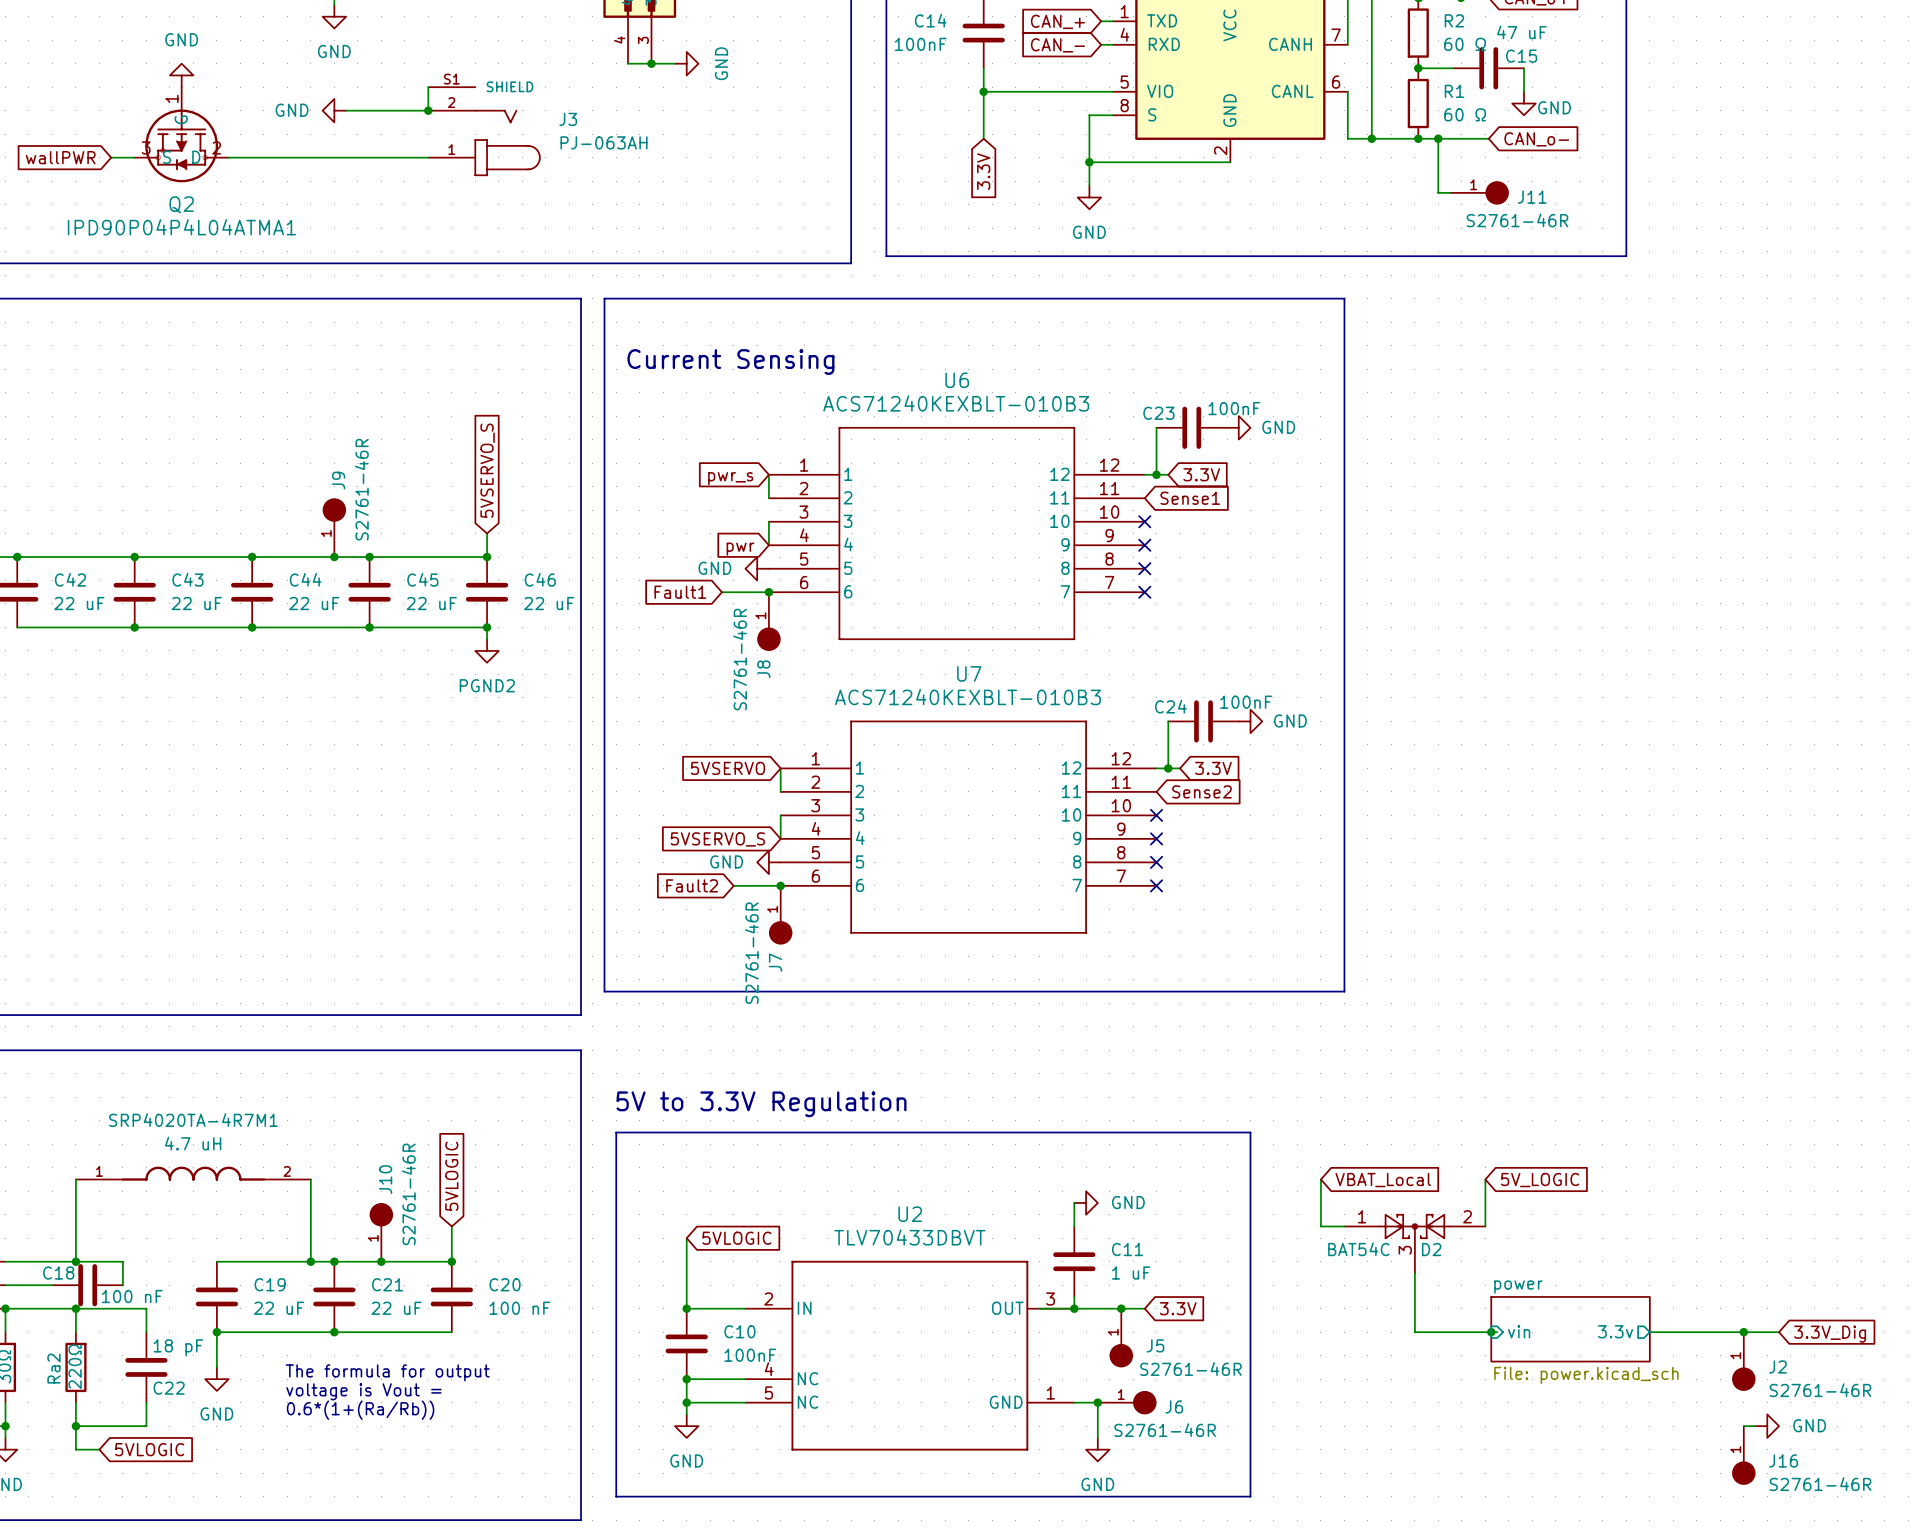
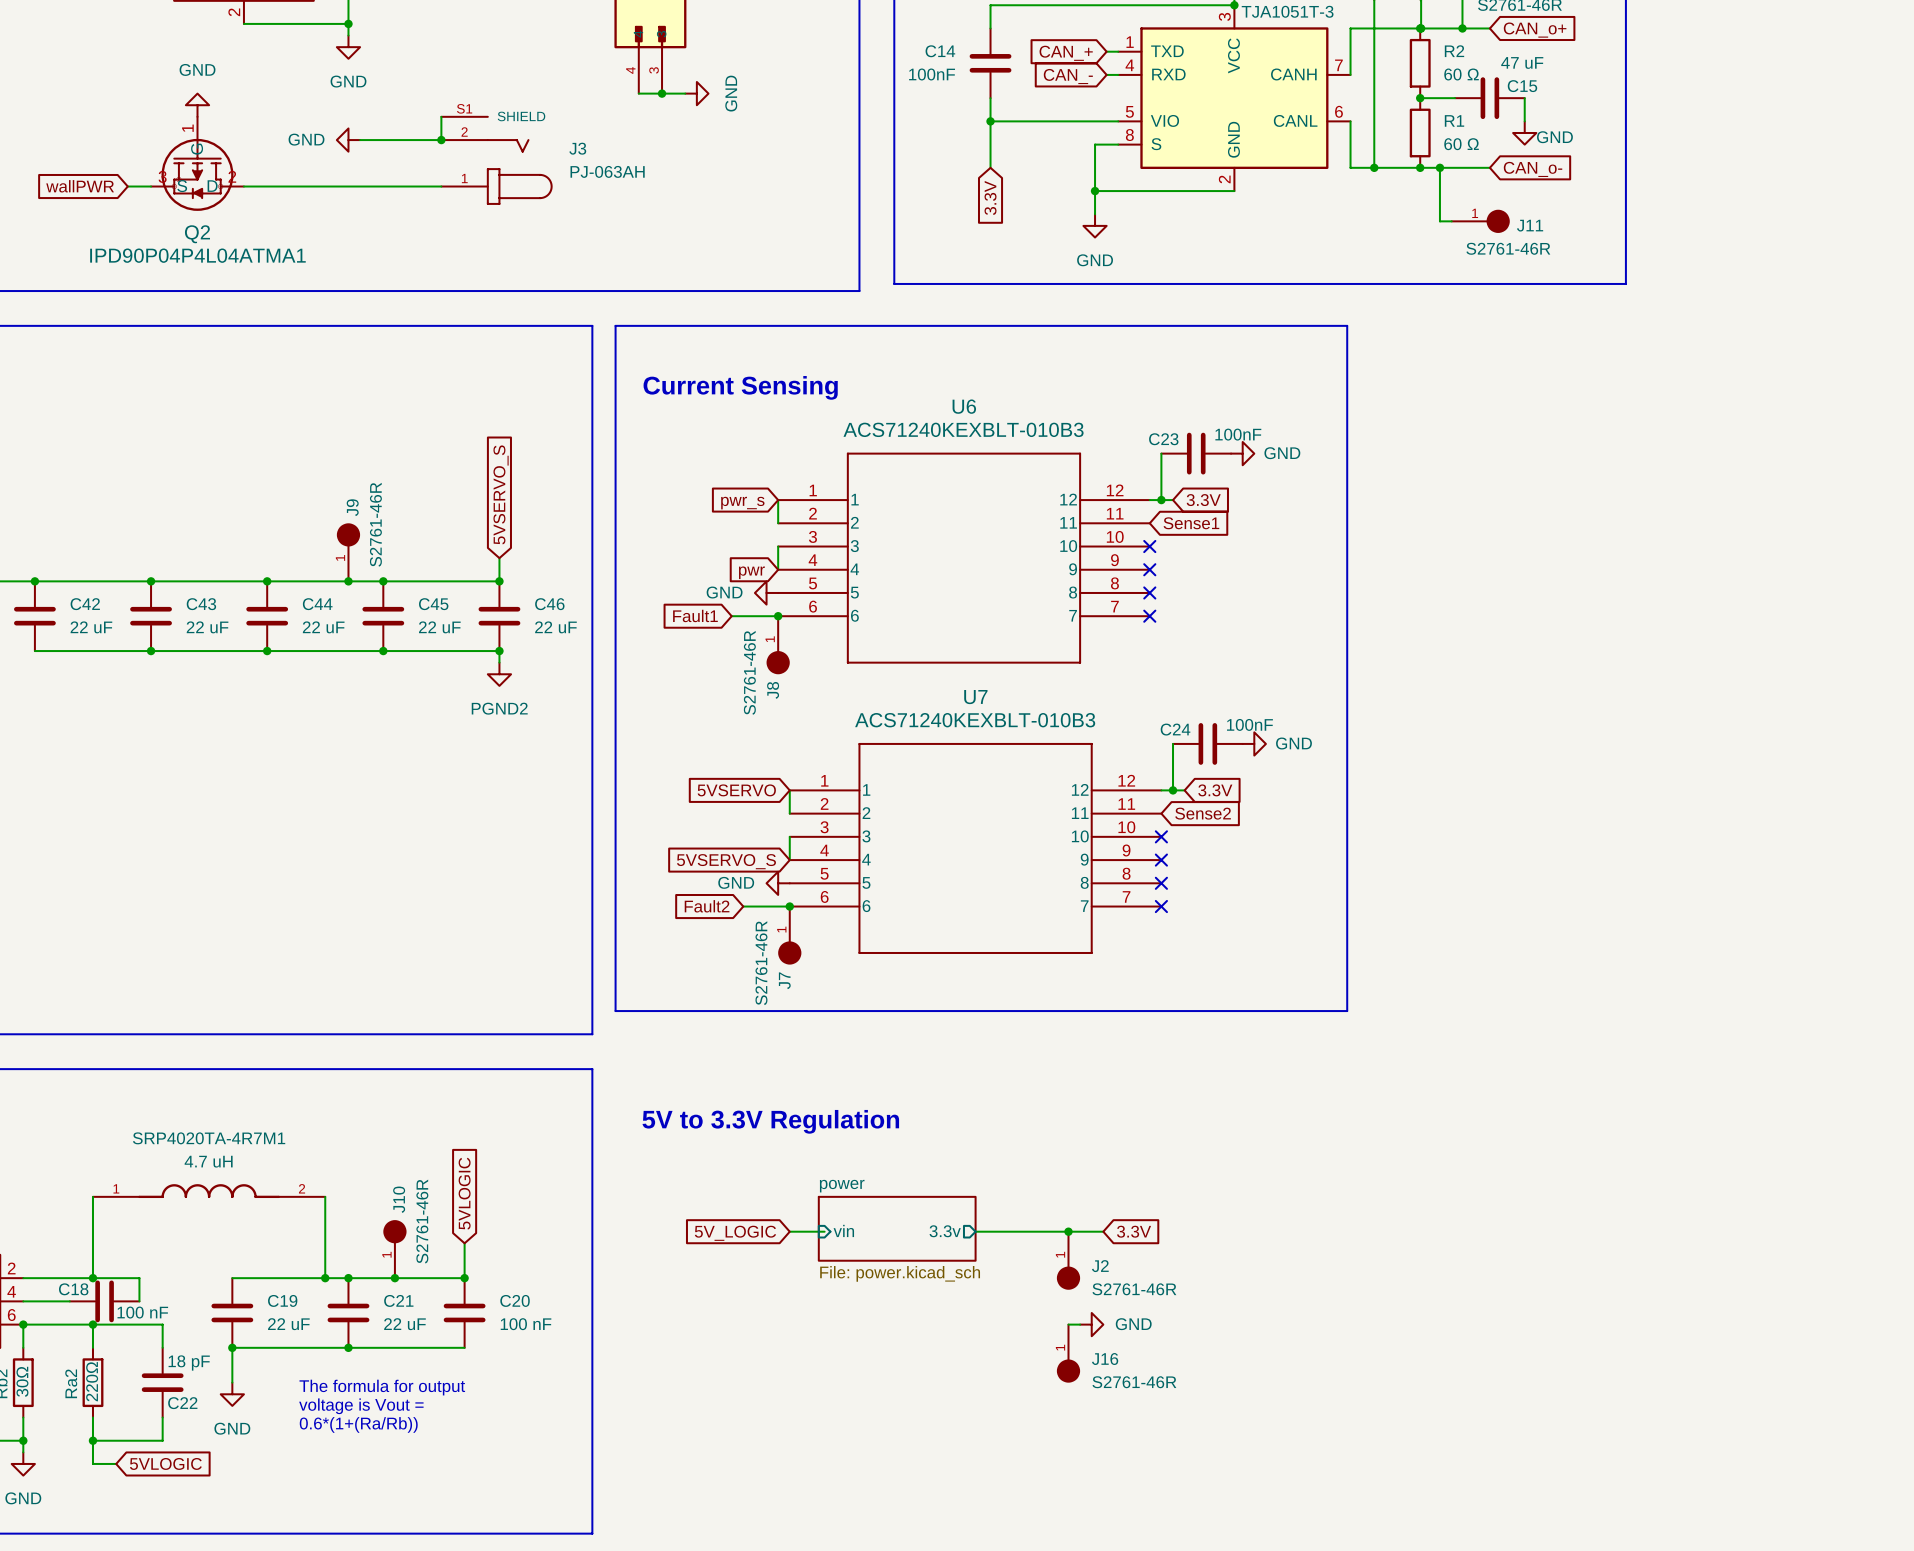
line: (616, 1132) (1250, 1132) (1250, 1496) (616, 1496) (616, 1132) -> none
wire: (1320, 1179) (1320, 1226) (1344, 1226) -> none
wire: (1485, 1179) (1485, 1226) -> none
global label: VBAT_Local (1383, 1180) -> none
global label: 5V_LOGIC (1540, 1180) -> none
wire: (1074, 1202) (1074, 1226) -> none
power symbol: GND (1086, 1202) -> none
sheet power: none -> File: power.kicad_sch (897, 1228)
wire: none -> (789, 1231) (824, 1231)
sheet pin: none -> vin (843, 1230)
sheet pin: none -> 3.3v (945, 1231)
wire: none -> (975, 1231) (1103, 1231)
junction: none -> (1068, 1231)
wire: (686, 1238) (686, 1308) (745, 1308) -> none
global label: 5VLOGIC (736, 1238) -> 5V_LOGIC (735, 1233)
D2: BAT54C (1414, 1244) -> none
C11: 1 uF (1074, 1261) -> none
wire: (1414, 1273) (1414, 1332) (1497, 1332) -> none
wire: (1074, 1296) (1074, 1308) (1144, 1308) -> none
junction: (686, 1308) -> none
wire: (1039, 1308) (1062, 1308) -> none
junction: (1074, 1308) -> none
power symbol: none -> GND (1091, 1324)
junction: (1121, 1308) -> none
global label position: 3.3V (1178, 1308) -> 3.3V (1134, 1231)
sheet power: File: power.kicad_sch (1570, 1329) -> none
sheet pin: vin (1519, 1331) -> none
sheet pin: 3.3v (1615, 1331) -> none
junction: (1491, 1332) -> none
wire: (1649, 1332) (1779, 1332) -> none
junction: (1743, 1332) -> none
global label: 3.3V_Dig (1830, 1334) -> none
J5: S2761-46R (1121, 1338) -> none
C10: 100nF (686, 1343) -> none
U2: TLV70433DBVT (909, 1355) -> none
J2 position: (1743, 1361) -> (1068, 1260)
junction: (686, 1379) -> none
wire: (745, 1379) (686, 1379) (686, 1414) -> none
wire: (686, 1402) (745, 1402) -> none
junction: (686, 1402) -> none
wire: (1074, 1402) (1097, 1402) (1097, 1437) -> none
junction: (1097, 1402) -> none
J6: S2761-46R (1127, 1402) -> none
power symbol: GND (686, 1426) -> none
wire: (1743, 1426) (1755, 1426) -> none
power symbol: GND (1767, 1426) -> none
power symbol: GND (1097, 1449) -> none
J16 position: (1743, 1455) -> (1068, 1353)

